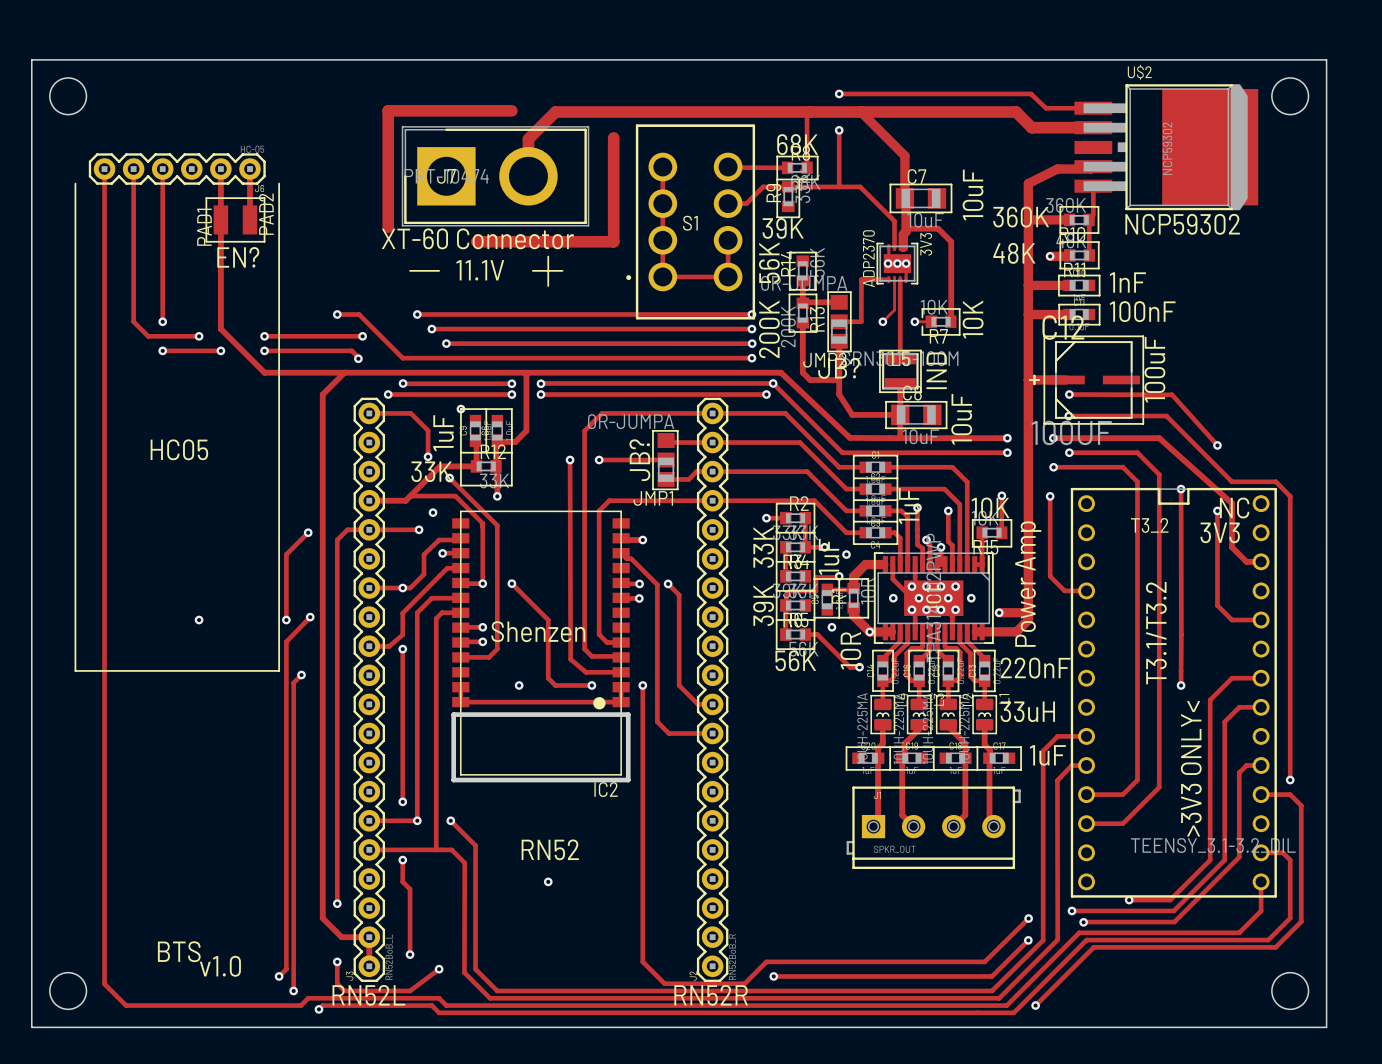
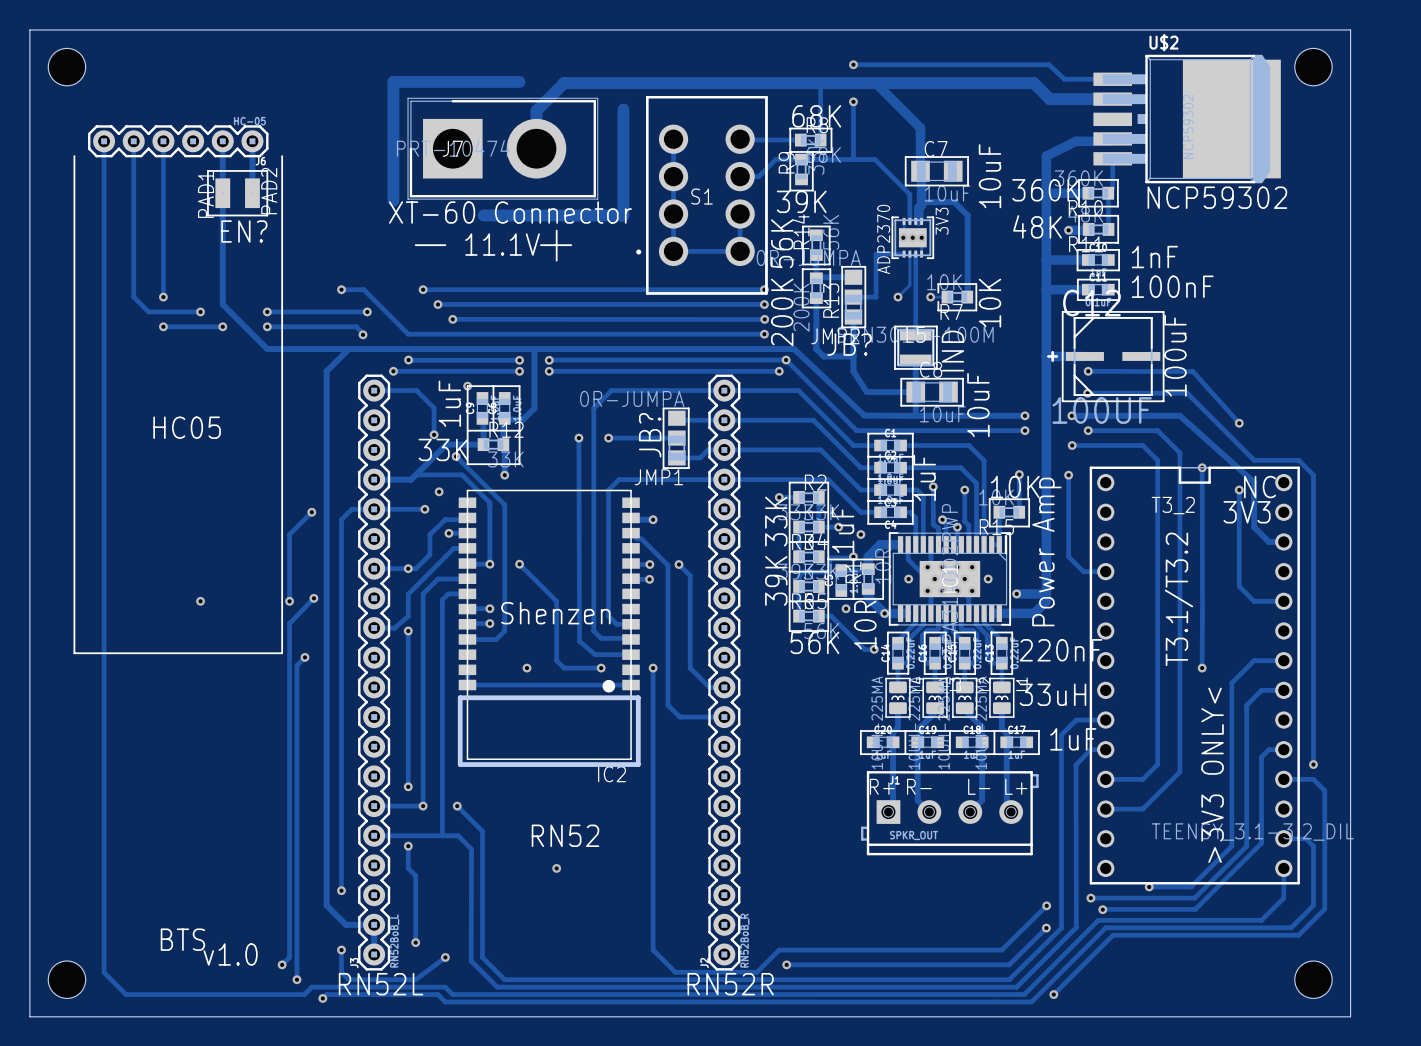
text: none -> R+ (882, 786)
text: none -> R- (919, 786)
text: none -> L- (979, 786)
text: none -> L+ (1016, 786)

